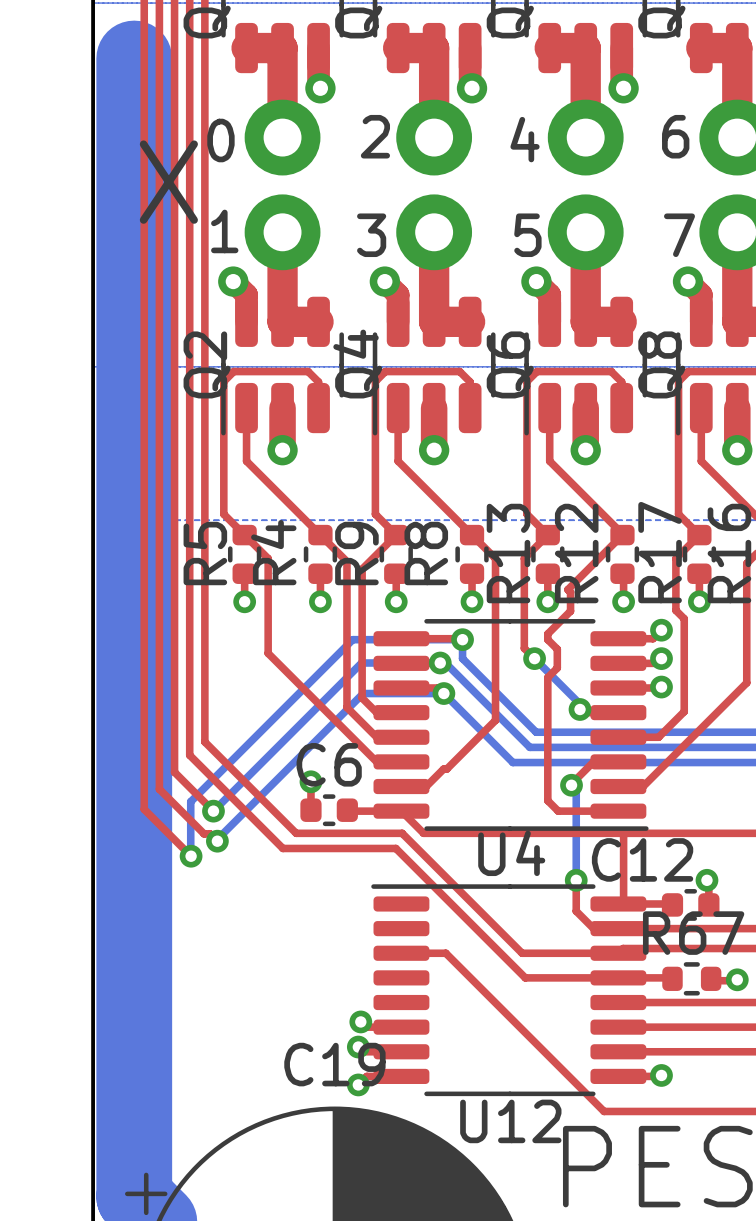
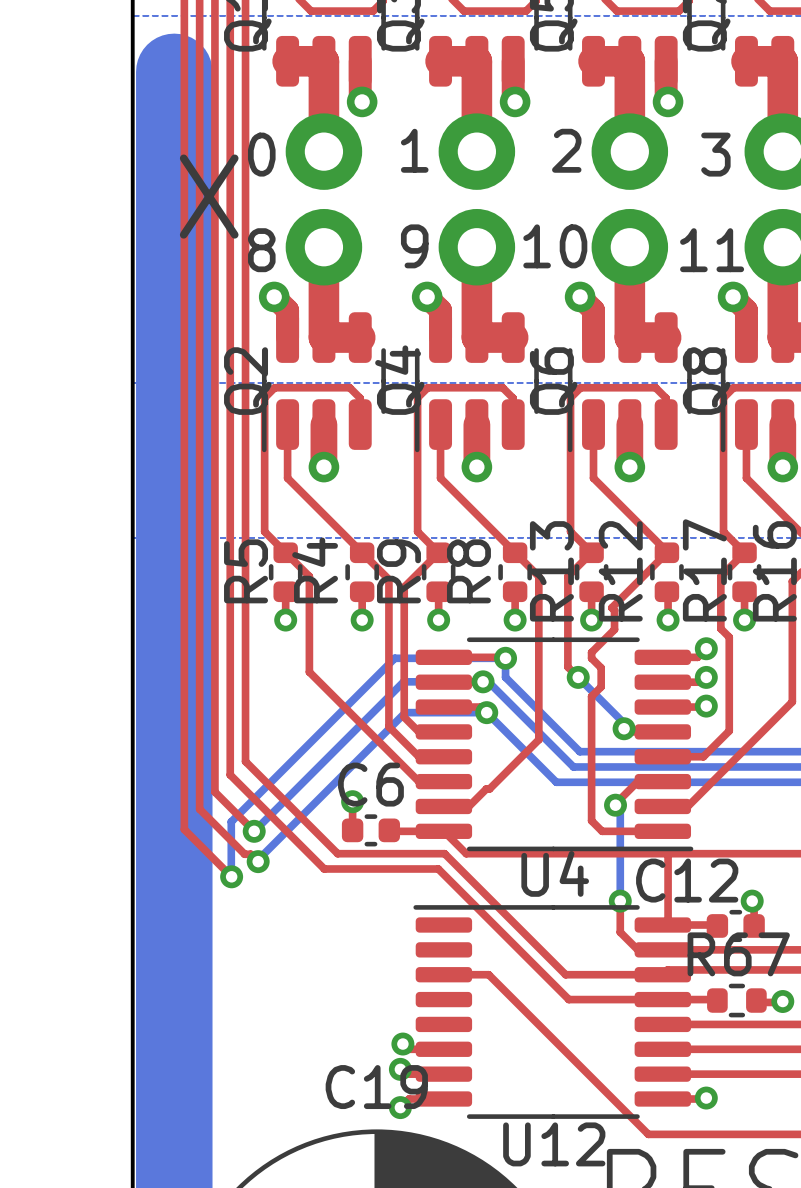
text: 2 (375, 136) -> 1 (414, 150)
text: 6 (675, 136) -> 3 (715, 154)
text: 4 (525, 139) -> 2 (566, 150)
text: 1 (224, 231) -> 8 (261, 250)
text: 3 (371, 235) -> 9 (414, 246)
text: 5 (527, 235) -> 10 (555, 246)
text: 7 (679, 235) -> 11 (712, 250)

